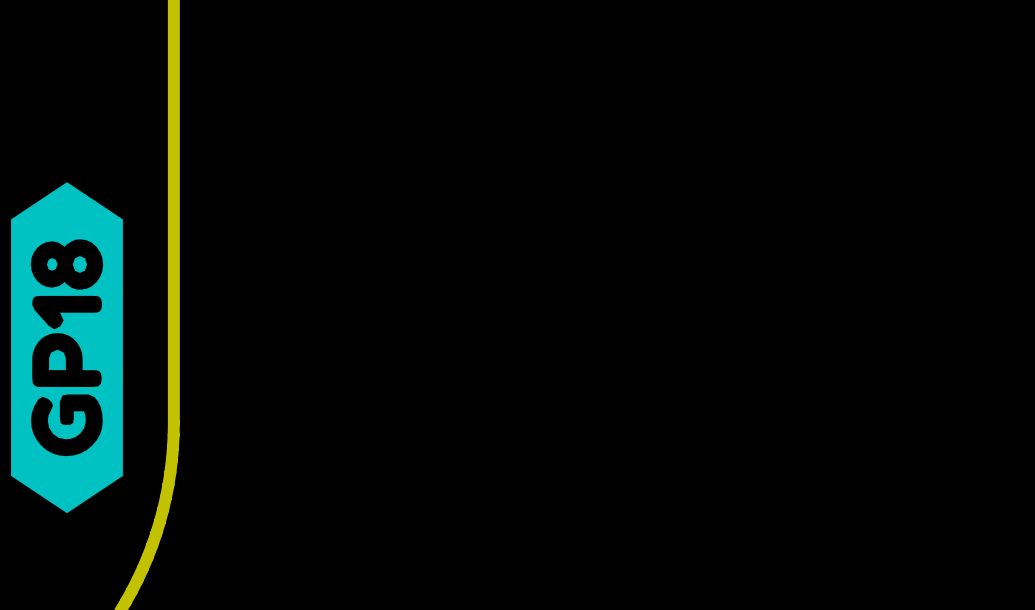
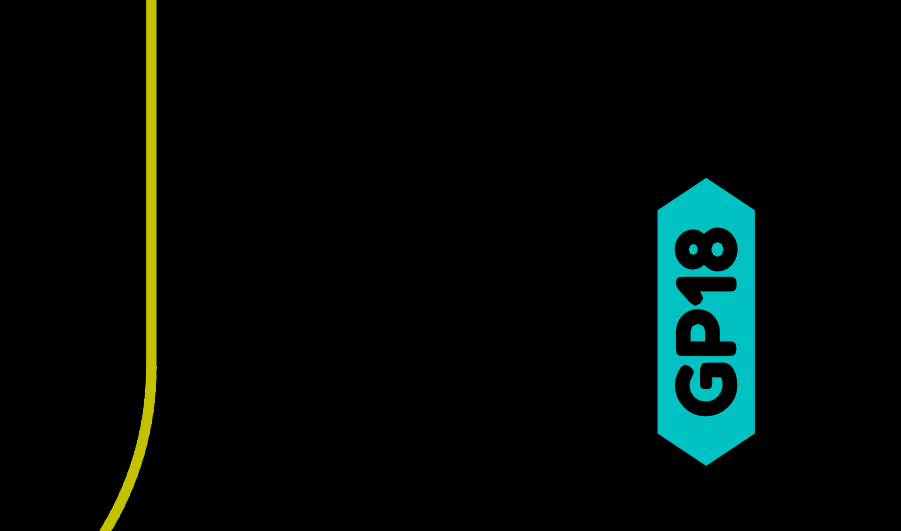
drawing position: (66, 347) -> (706, 321)

